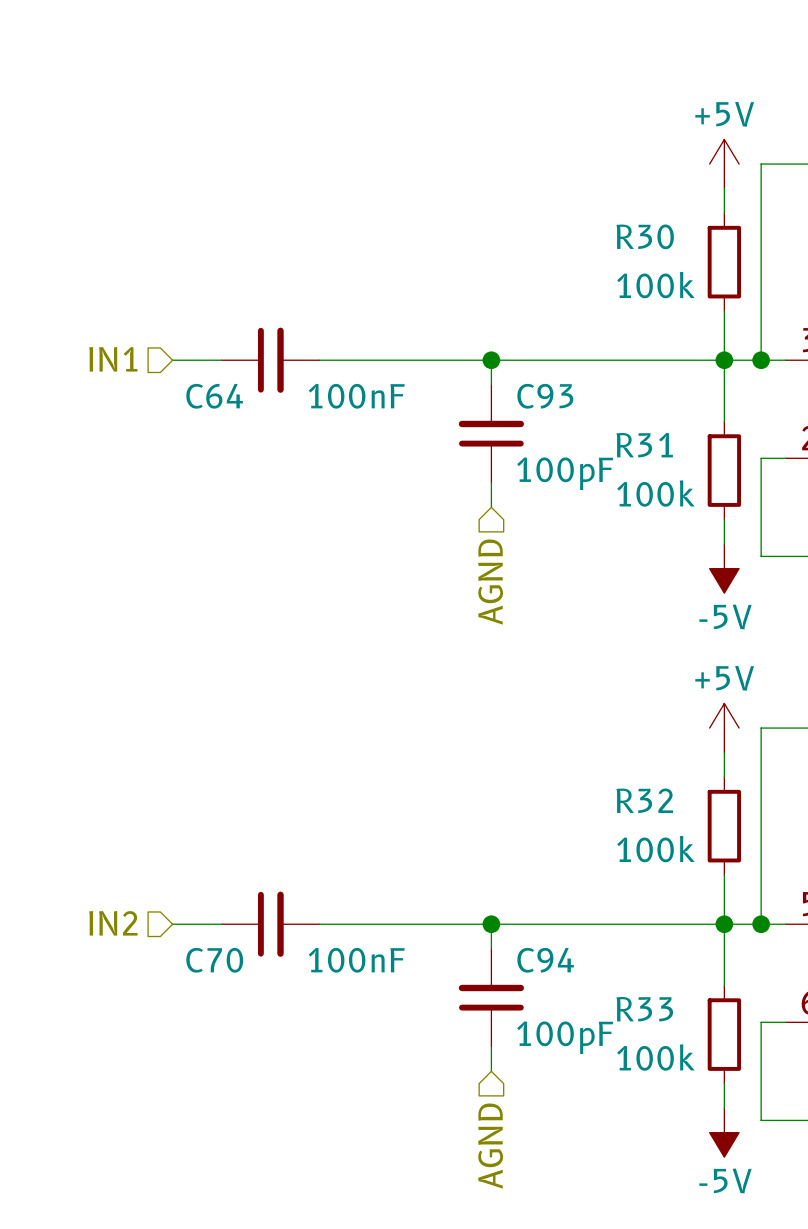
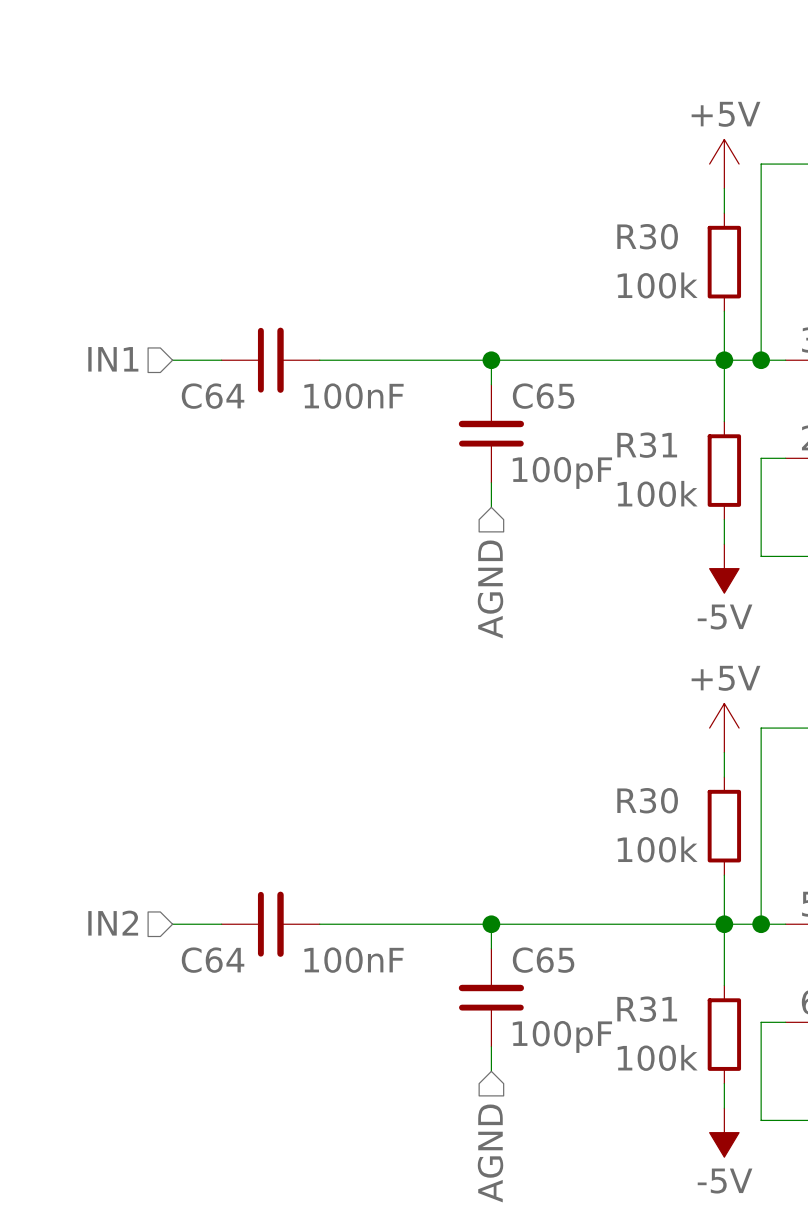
C93 name: C93 (545, 396) -> C65 (543, 396)
R32 name: R32 (644, 800) -> R30 (647, 800)
C70 name: C70 (214, 960) -> C64 (213, 960)
C94 name: C94 (545, 960) -> C65 (543, 960)
R33 name: R33 (644, 1009) -> R31 (647, 1009)

